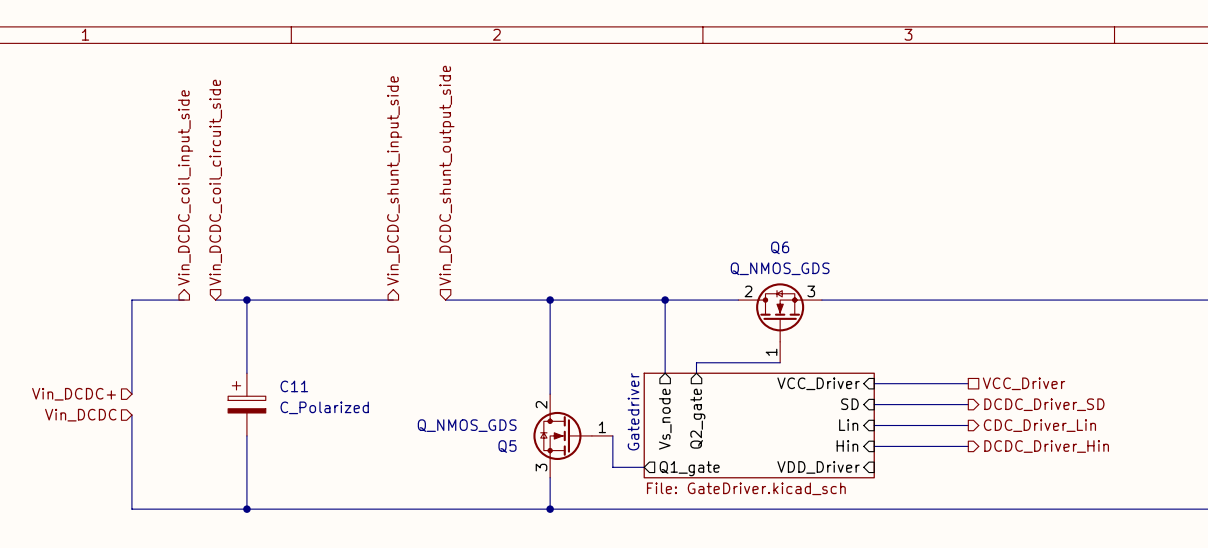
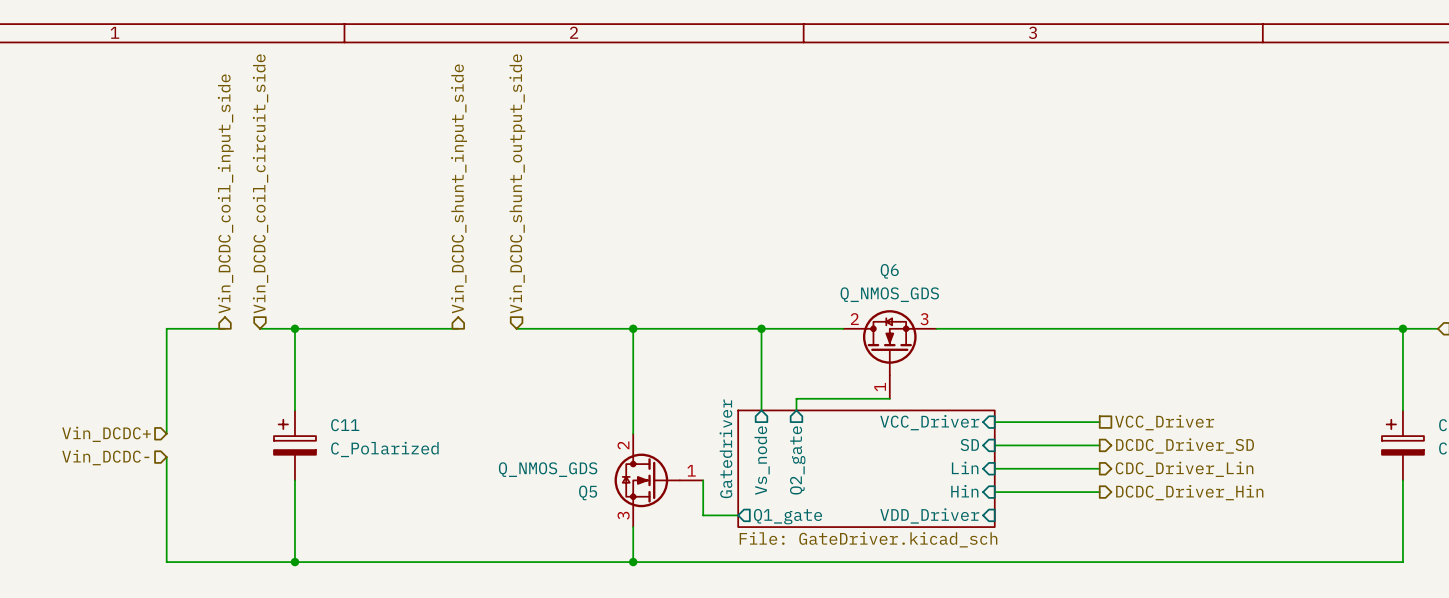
hierarchical label: Vin_DCDC (80, 415) -> Vin_DCDC- (105, 457)

